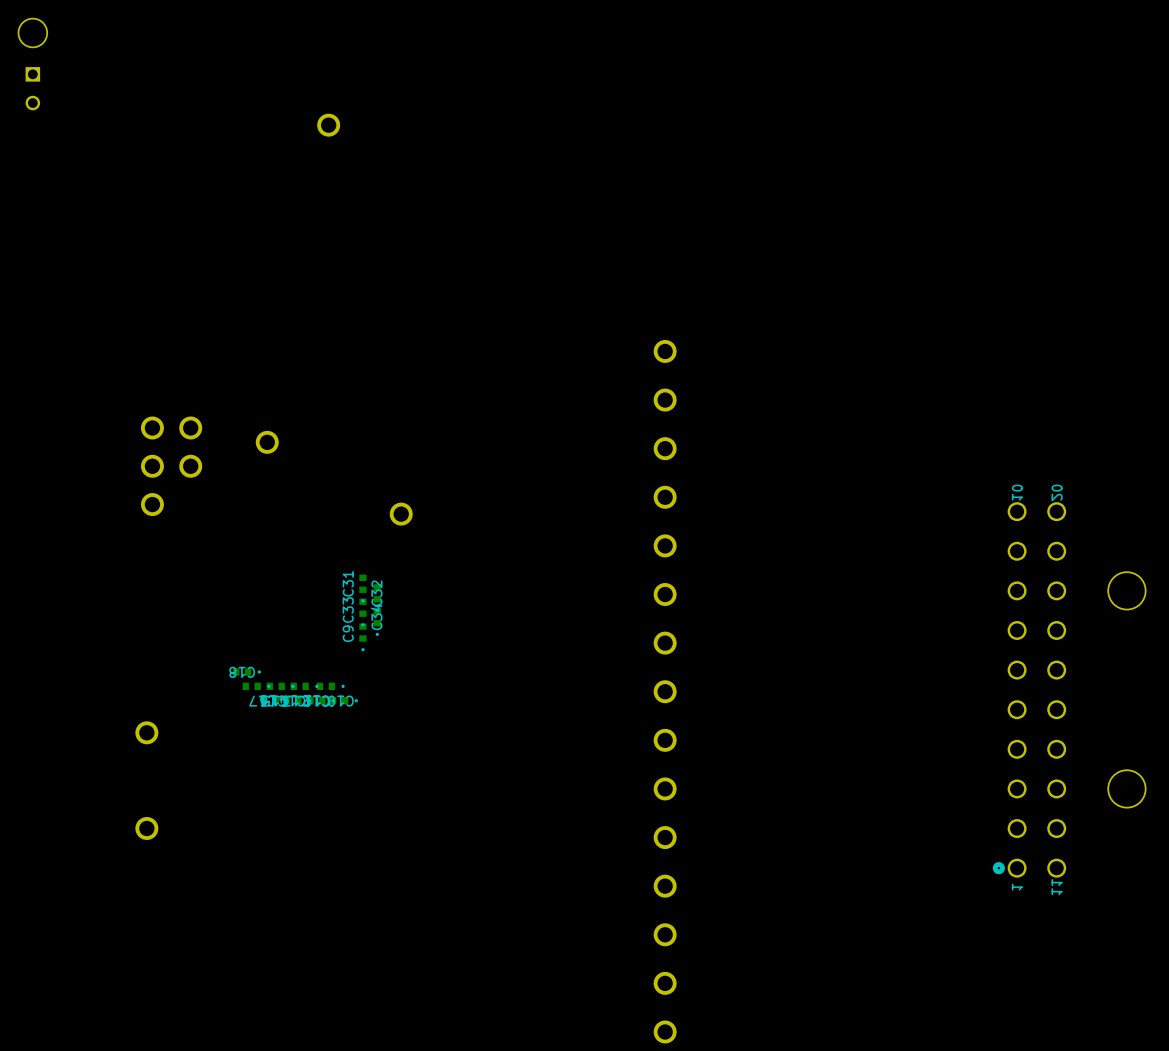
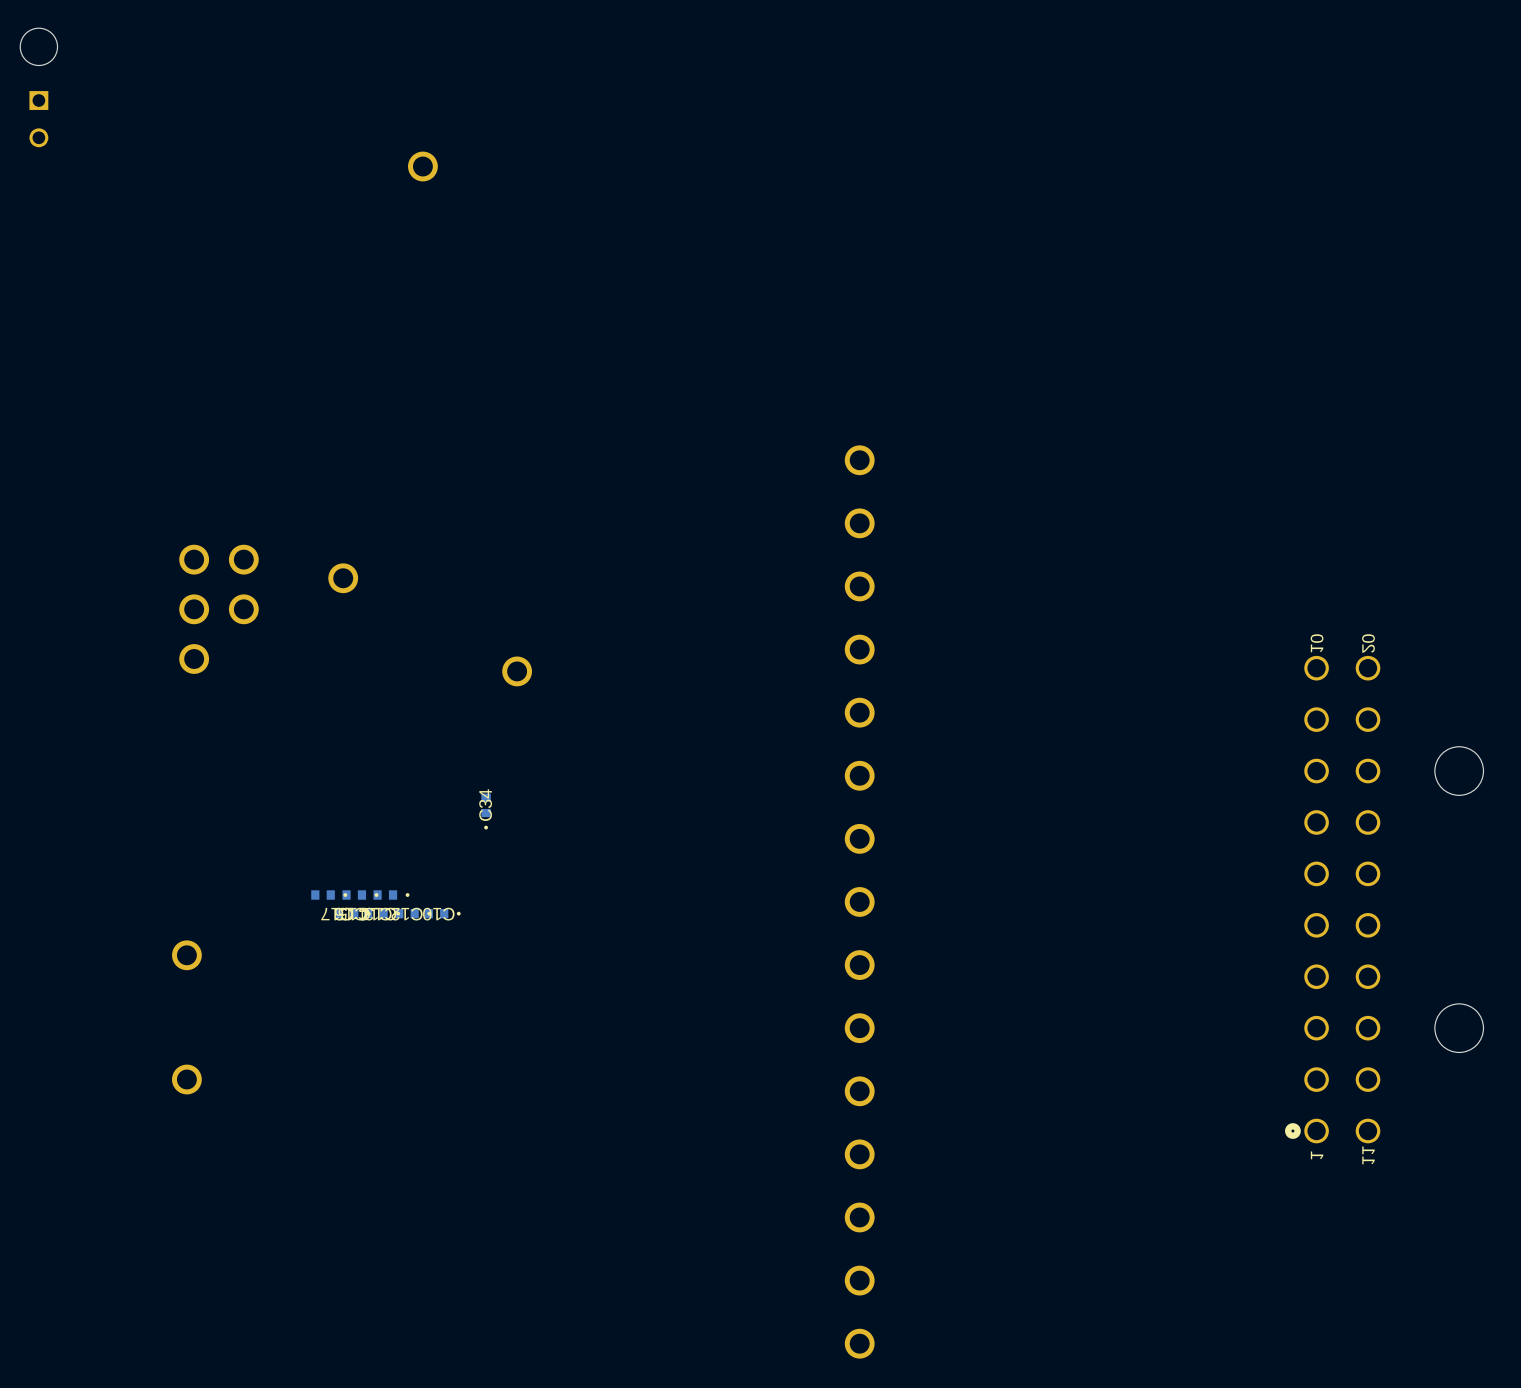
C31: (362, 588) -> none
C32: (377, 598) -> none
C33: (362, 612) -> none
C9: (362, 637) -> none
C18: (246, 672) -> none
part: (330, 686) -> none

